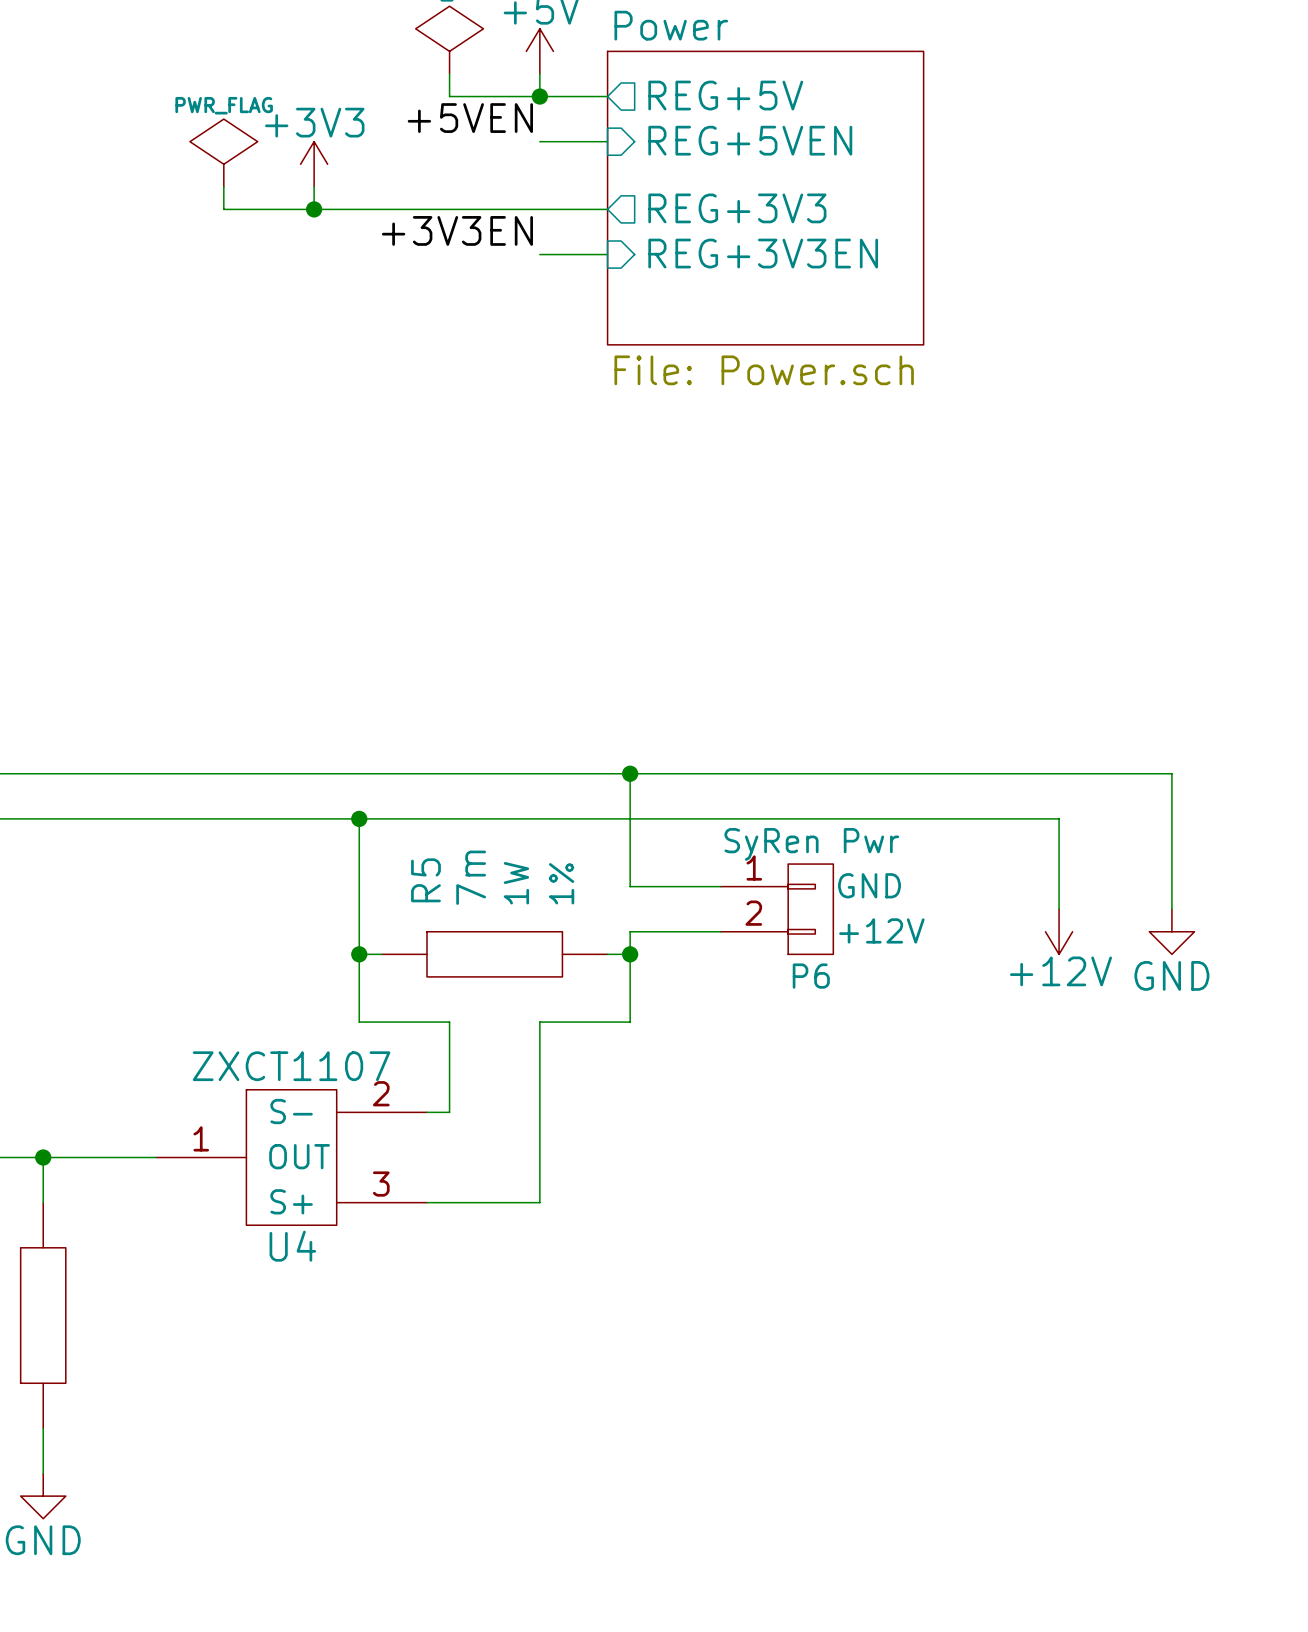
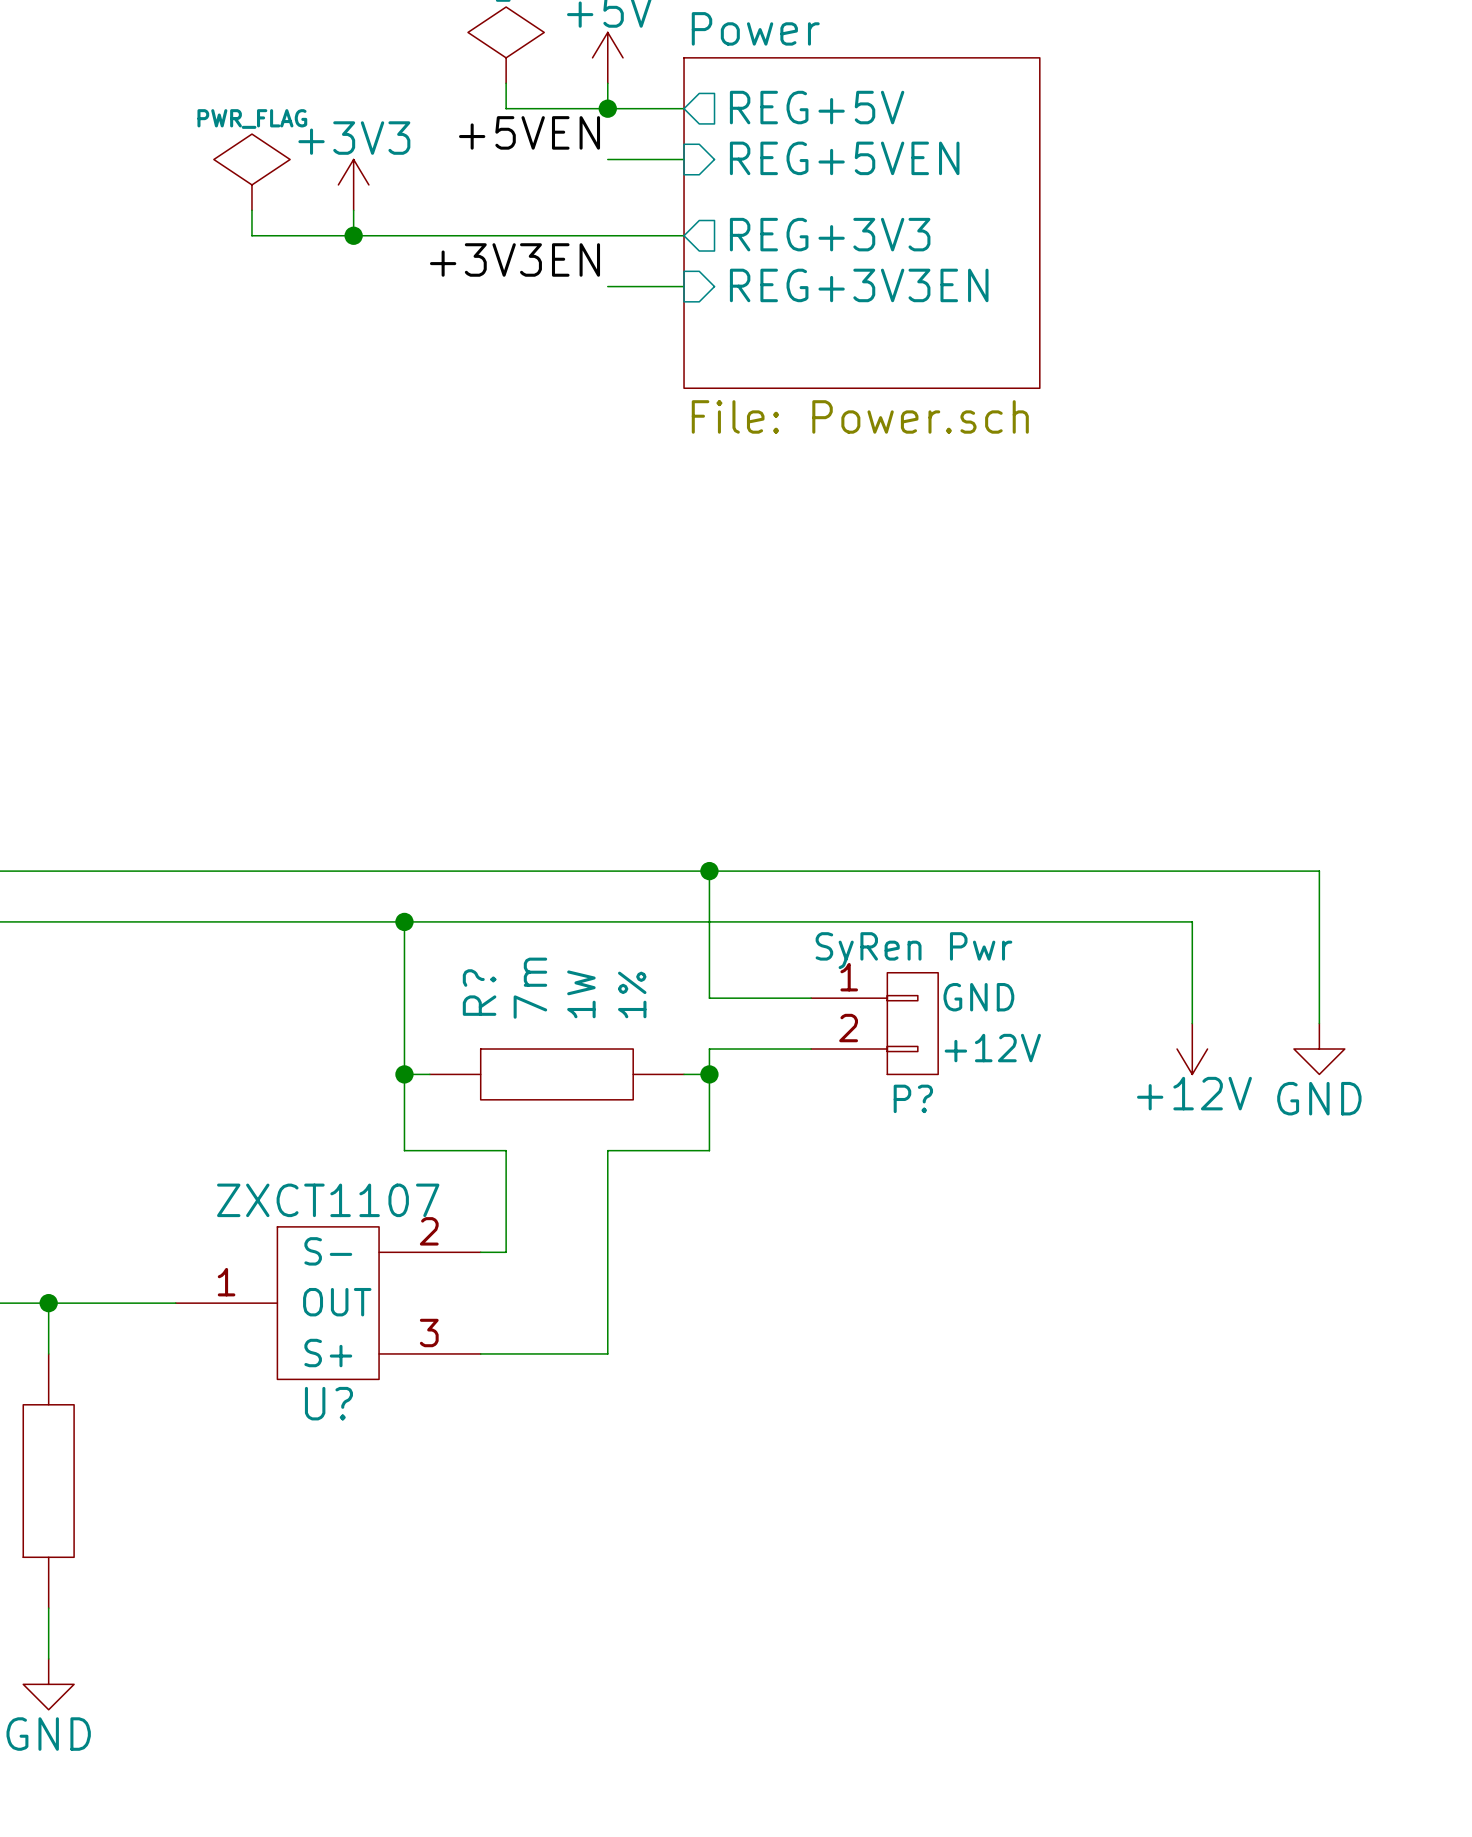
R5 name: R5 (425, 880) -> R? (479, 992)
P6 name: P6 (811, 976) -> P? (913, 1098)
U4 name: U4 (292, 1246) -> U? (328, 1403)

